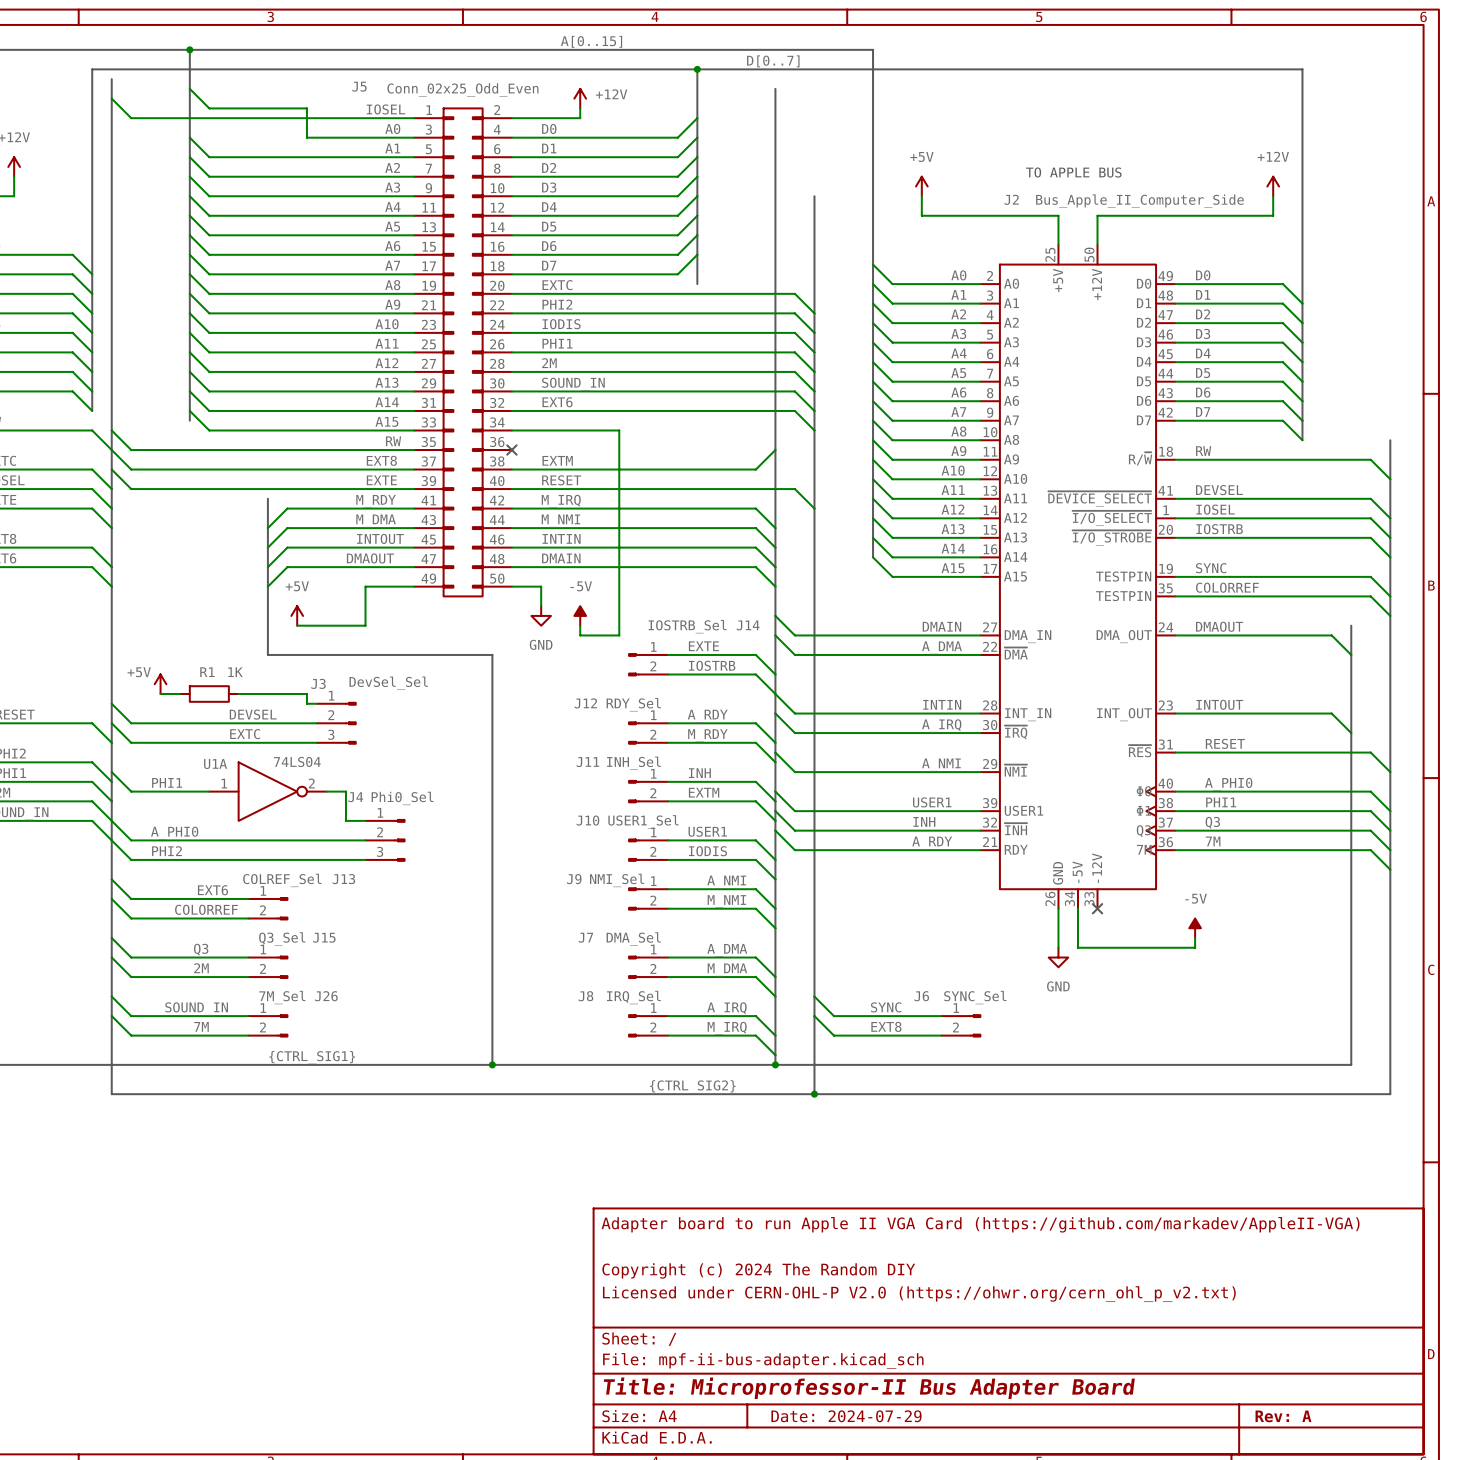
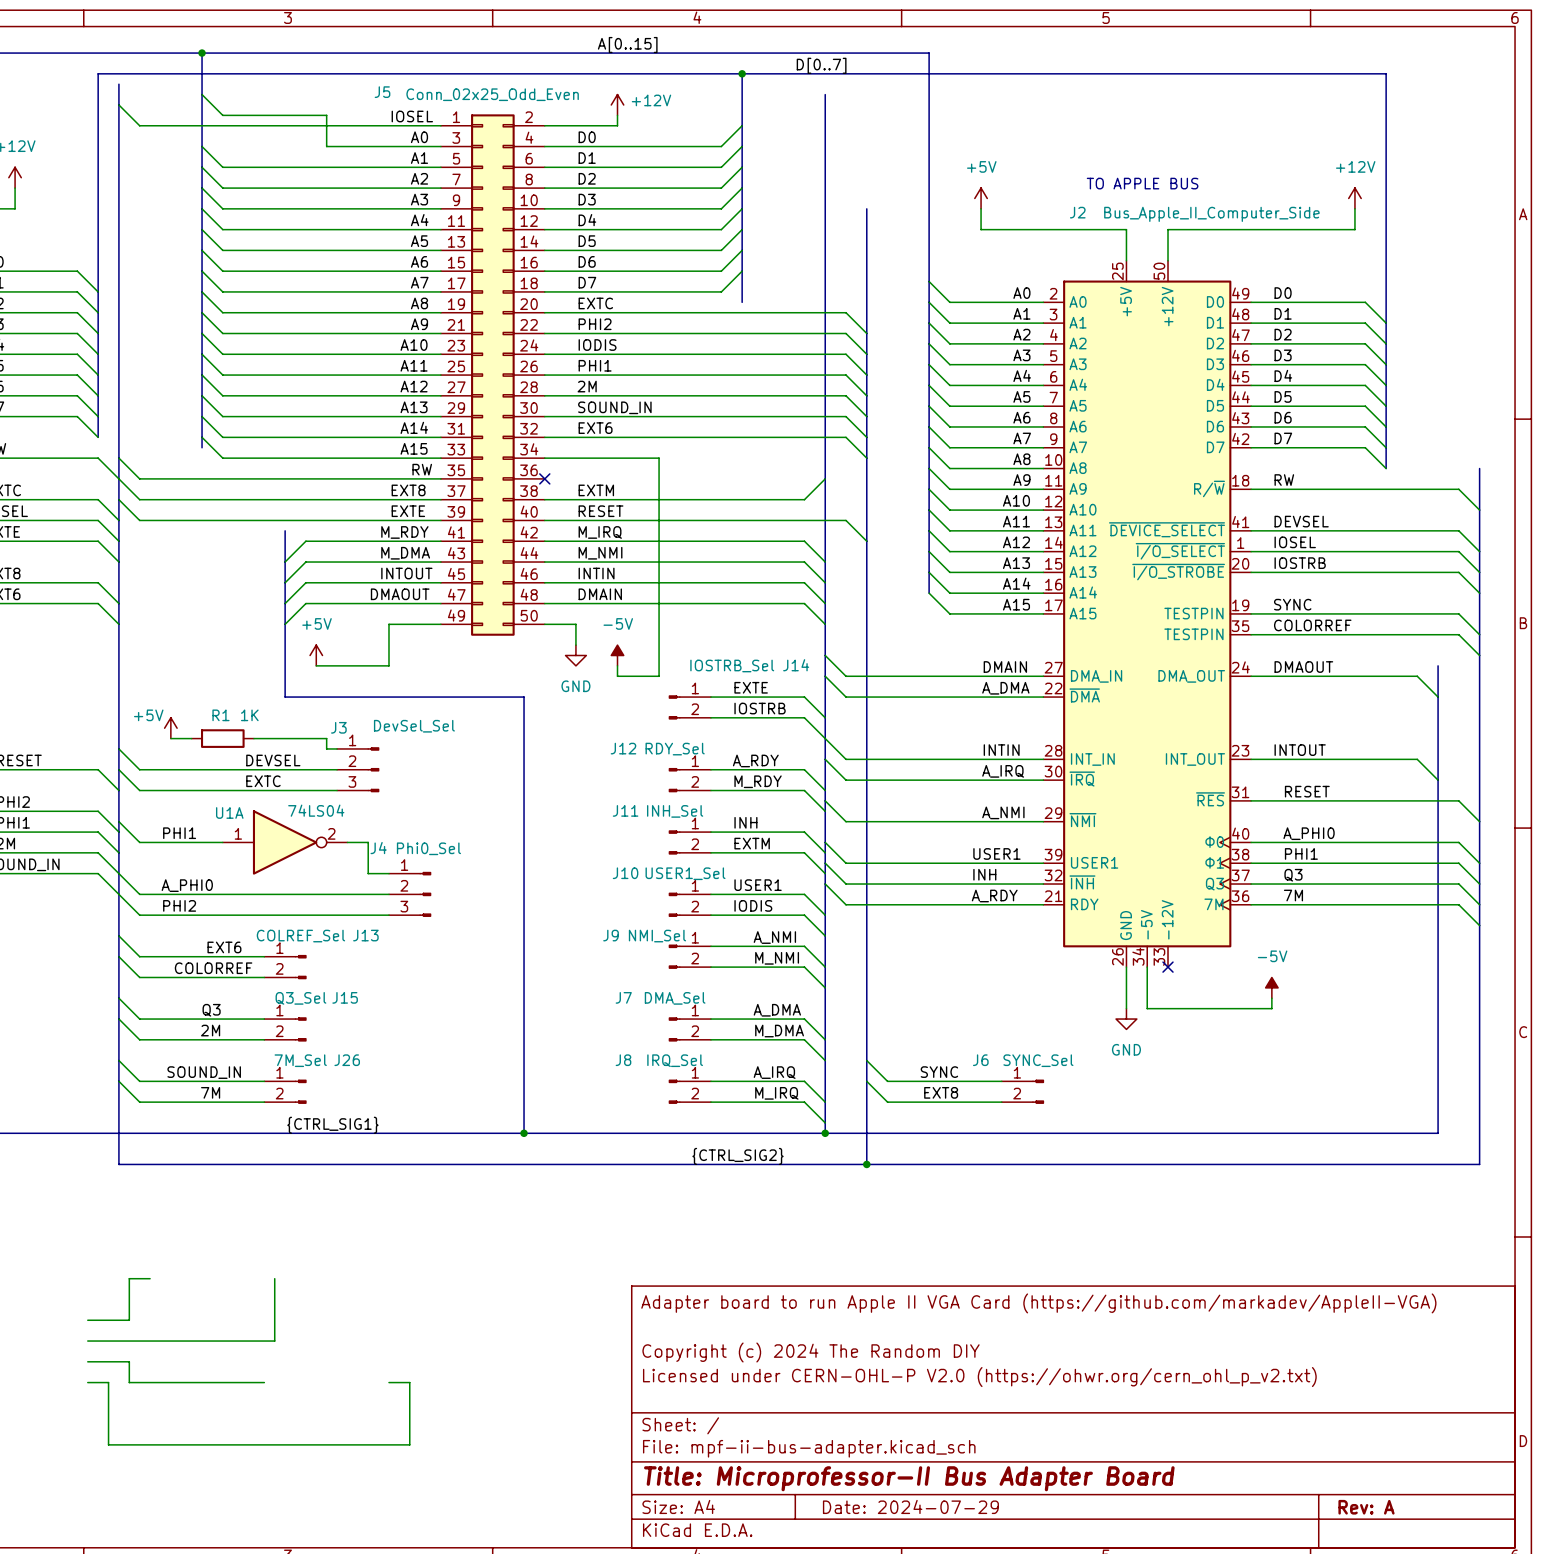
wire: none -> (150, 1278) (129, 1278) (129, 1320) (87, 1320)
wire: none -> (274, 1278) (274, 1341) (87, 1341)
wire: none -> (87, 1361) (129, 1361) (129, 1382) (264, 1382)
wire: none -> (87, 1382) (108, 1382) (108, 1444) (409, 1444) (409, 1382) (388, 1382)

